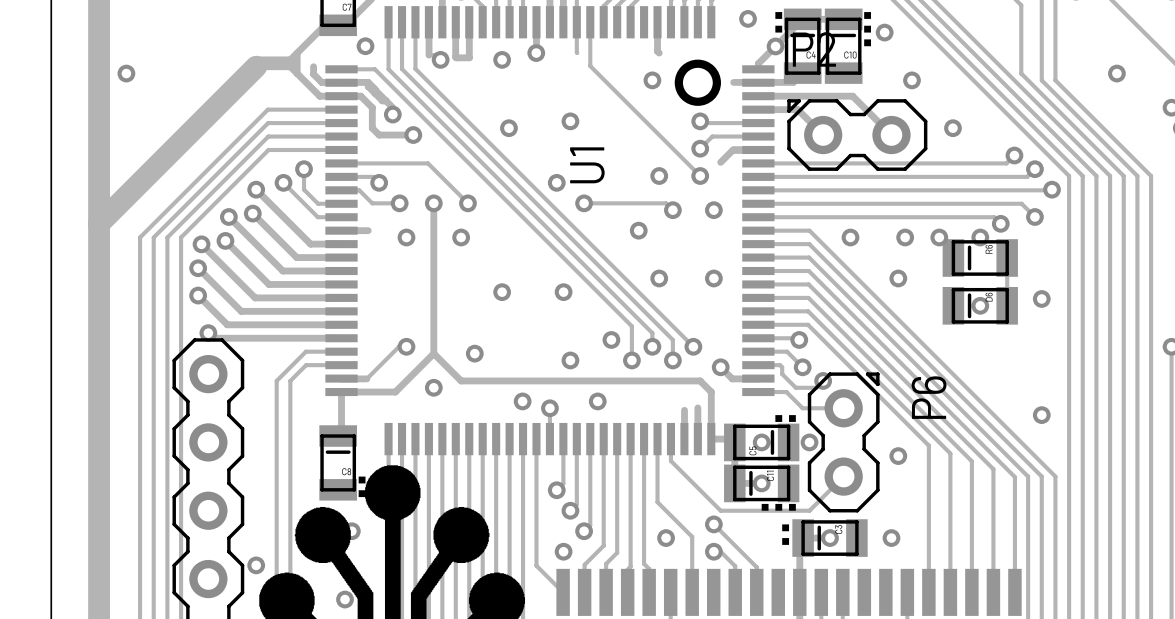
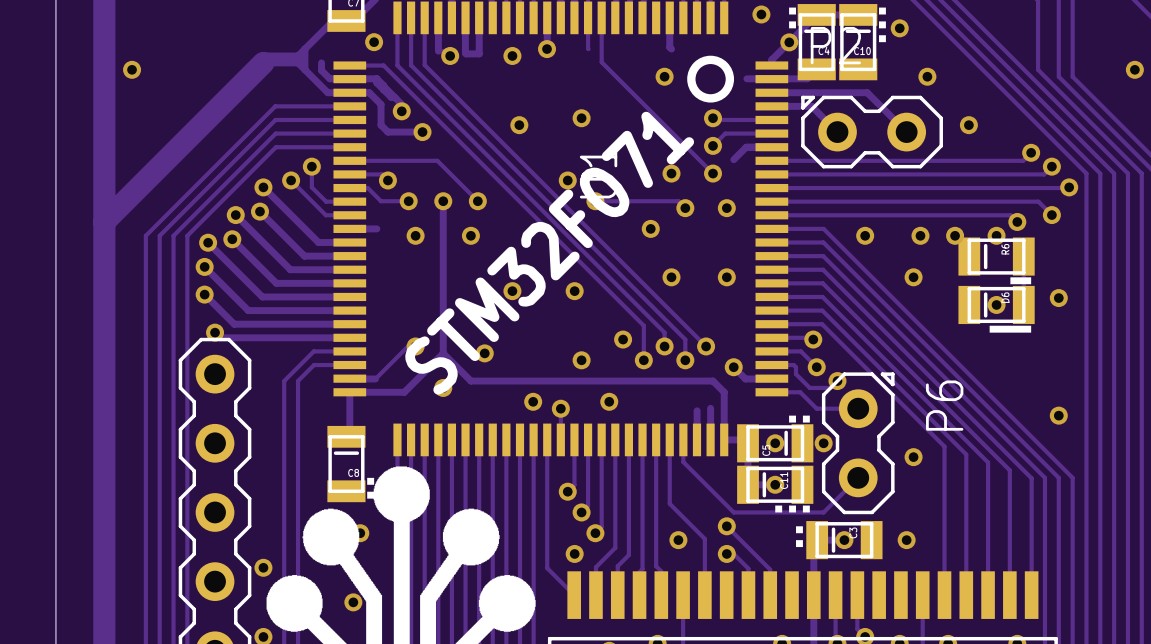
text: none -> STM32F071 (549, 253)
drawing: none -> [1010, 277, 1032, 285]
drawing: none -> [989, 325, 1032, 333]

